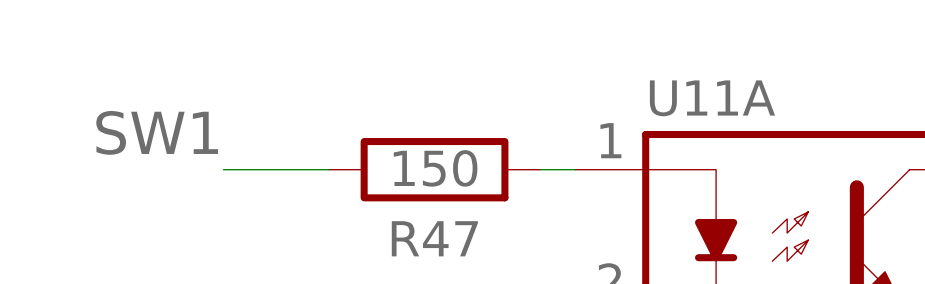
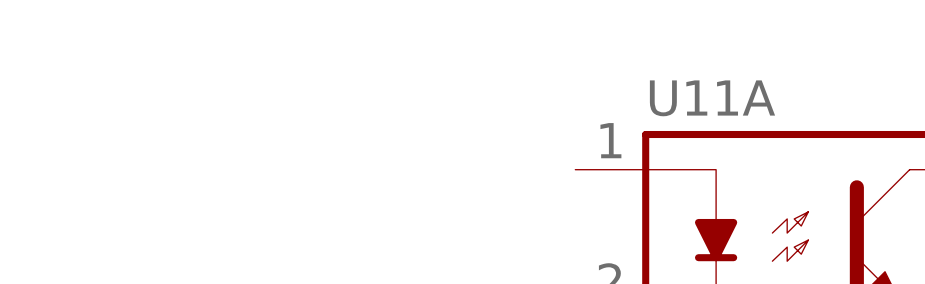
label: SW1 (157, 132) -> none
wire: (223, 169) (328, 169) -> none
R47: 150 (434, 169) -> none
wire: (540, 169) (575, 169) -> none

